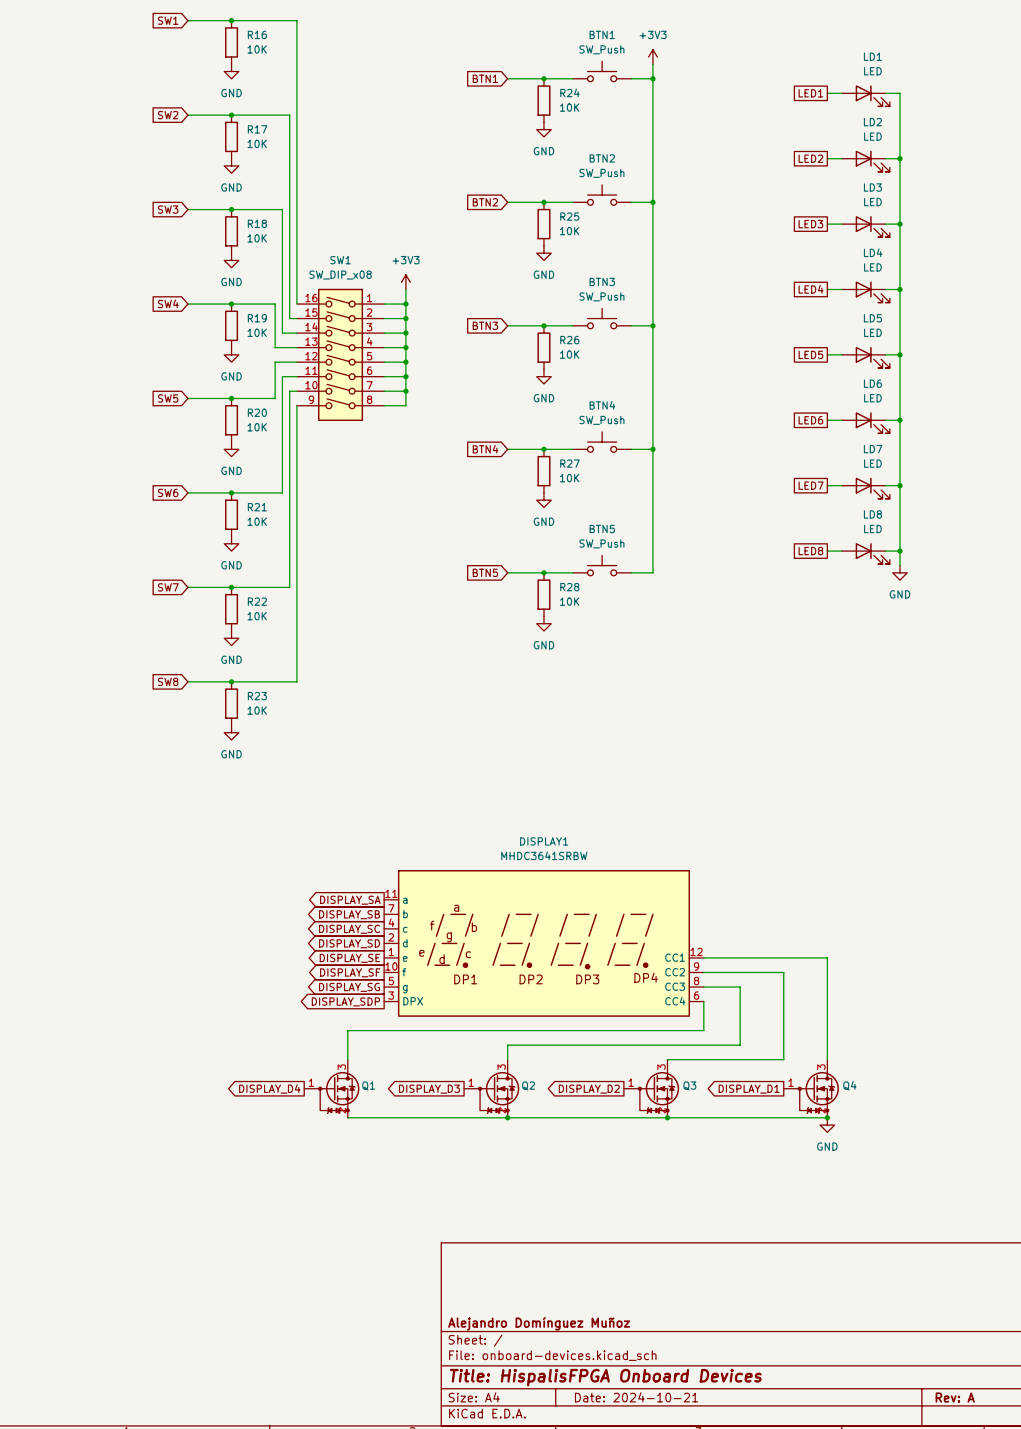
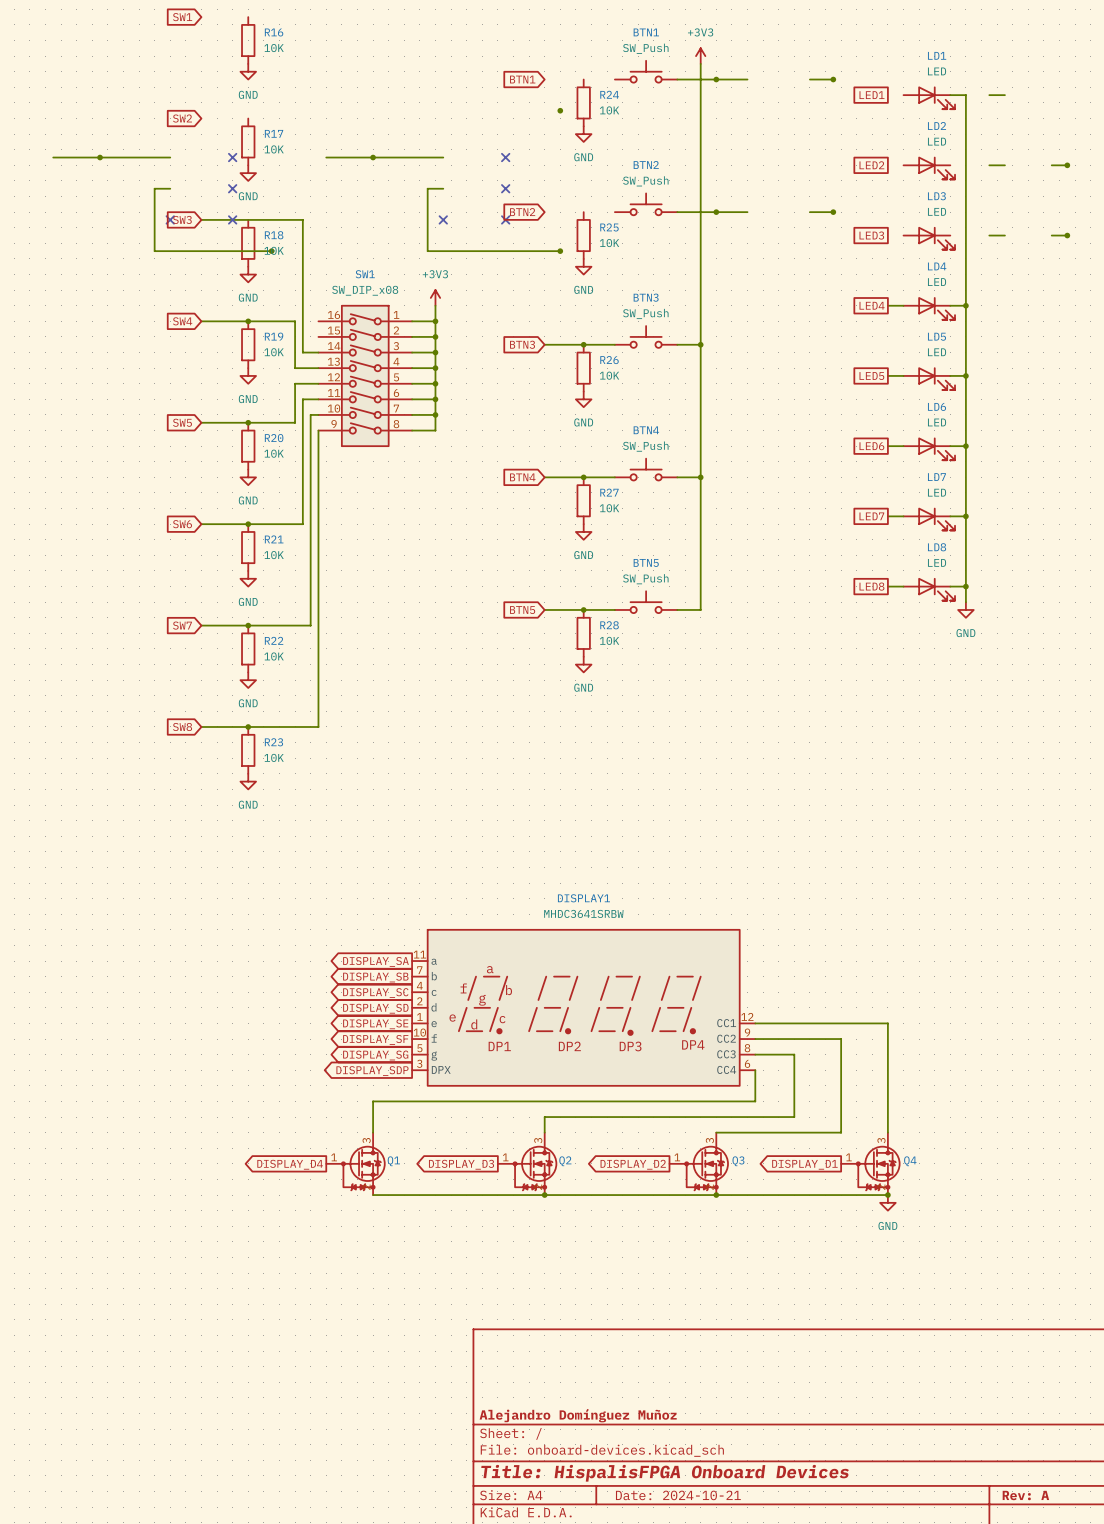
wire: (187, 20) (296, 20) (296, 304) -> none
junction: (231, 20) -> none
wire: (507, 78) (573, 78) -> none
junction: (543, 78) -> none
wire: none -> (700, 79) (747, 79)
junction position: (652, 78) -> (716, 79)
wire: none -> (809, 79) (833, 79)
junction: none -> (833, 79)
wire: (827, 93) (841, 93) -> (989, 95) (1004, 95)
junction: none -> (560, 110)
wire: (187, 115) (289, 115) (289, 318) (296, 318) -> none
junction: (231, 115) -> none
wire: none -> (53, 157) (170, 157)
junction: none -> (100, 157)
no-connect mark: none -> (232, 157)
wire: none -> (326, 157) (443, 157)
junction: none -> (373, 157)
no-connect mark: none -> (505, 157)
wire: (827, 158) (841, 158) -> (989, 165) (1004, 165)
wire: (885, 158) (900, 158) -> (1051, 165) (1067, 165)
junction: (900, 158) -> none
junction: none -> (1067, 165)
wire: none -> (170, 188) (154, 188) (154, 251) (271, 251)
no-connect mark: none -> (232, 188)
wire: none -> (443, 188) (427, 188) (427, 251) (560, 251)
no-connect mark: none -> (505, 188)
wire: (507, 202) (573, 202) -> none
junction: (543, 202) -> none
wire: none -> (700, 212) (747, 212)
junction position: (652, 202) -> (716, 212)
wire: none -> (809, 212) (833, 212)
junction: none -> (833, 212)
no-connect mark: none -> (170, 219)
no-connect mark: none -> (232, 219)
junction: (231, 209) -> none
no-connect mark: none -> (443, 219)
no-connect mark: none -> (505, 219)
wire: (827, 224) (841, 224) -> (989, 235) (1004, 235)
wire: (885, 224) (900, 224) -> (1051, 235) (1067, 235)
junction: (900, 224) -> none
junction: none -> (1067, 235)
junction: none -> (271, 251)
junction: none -> (560, 251)

